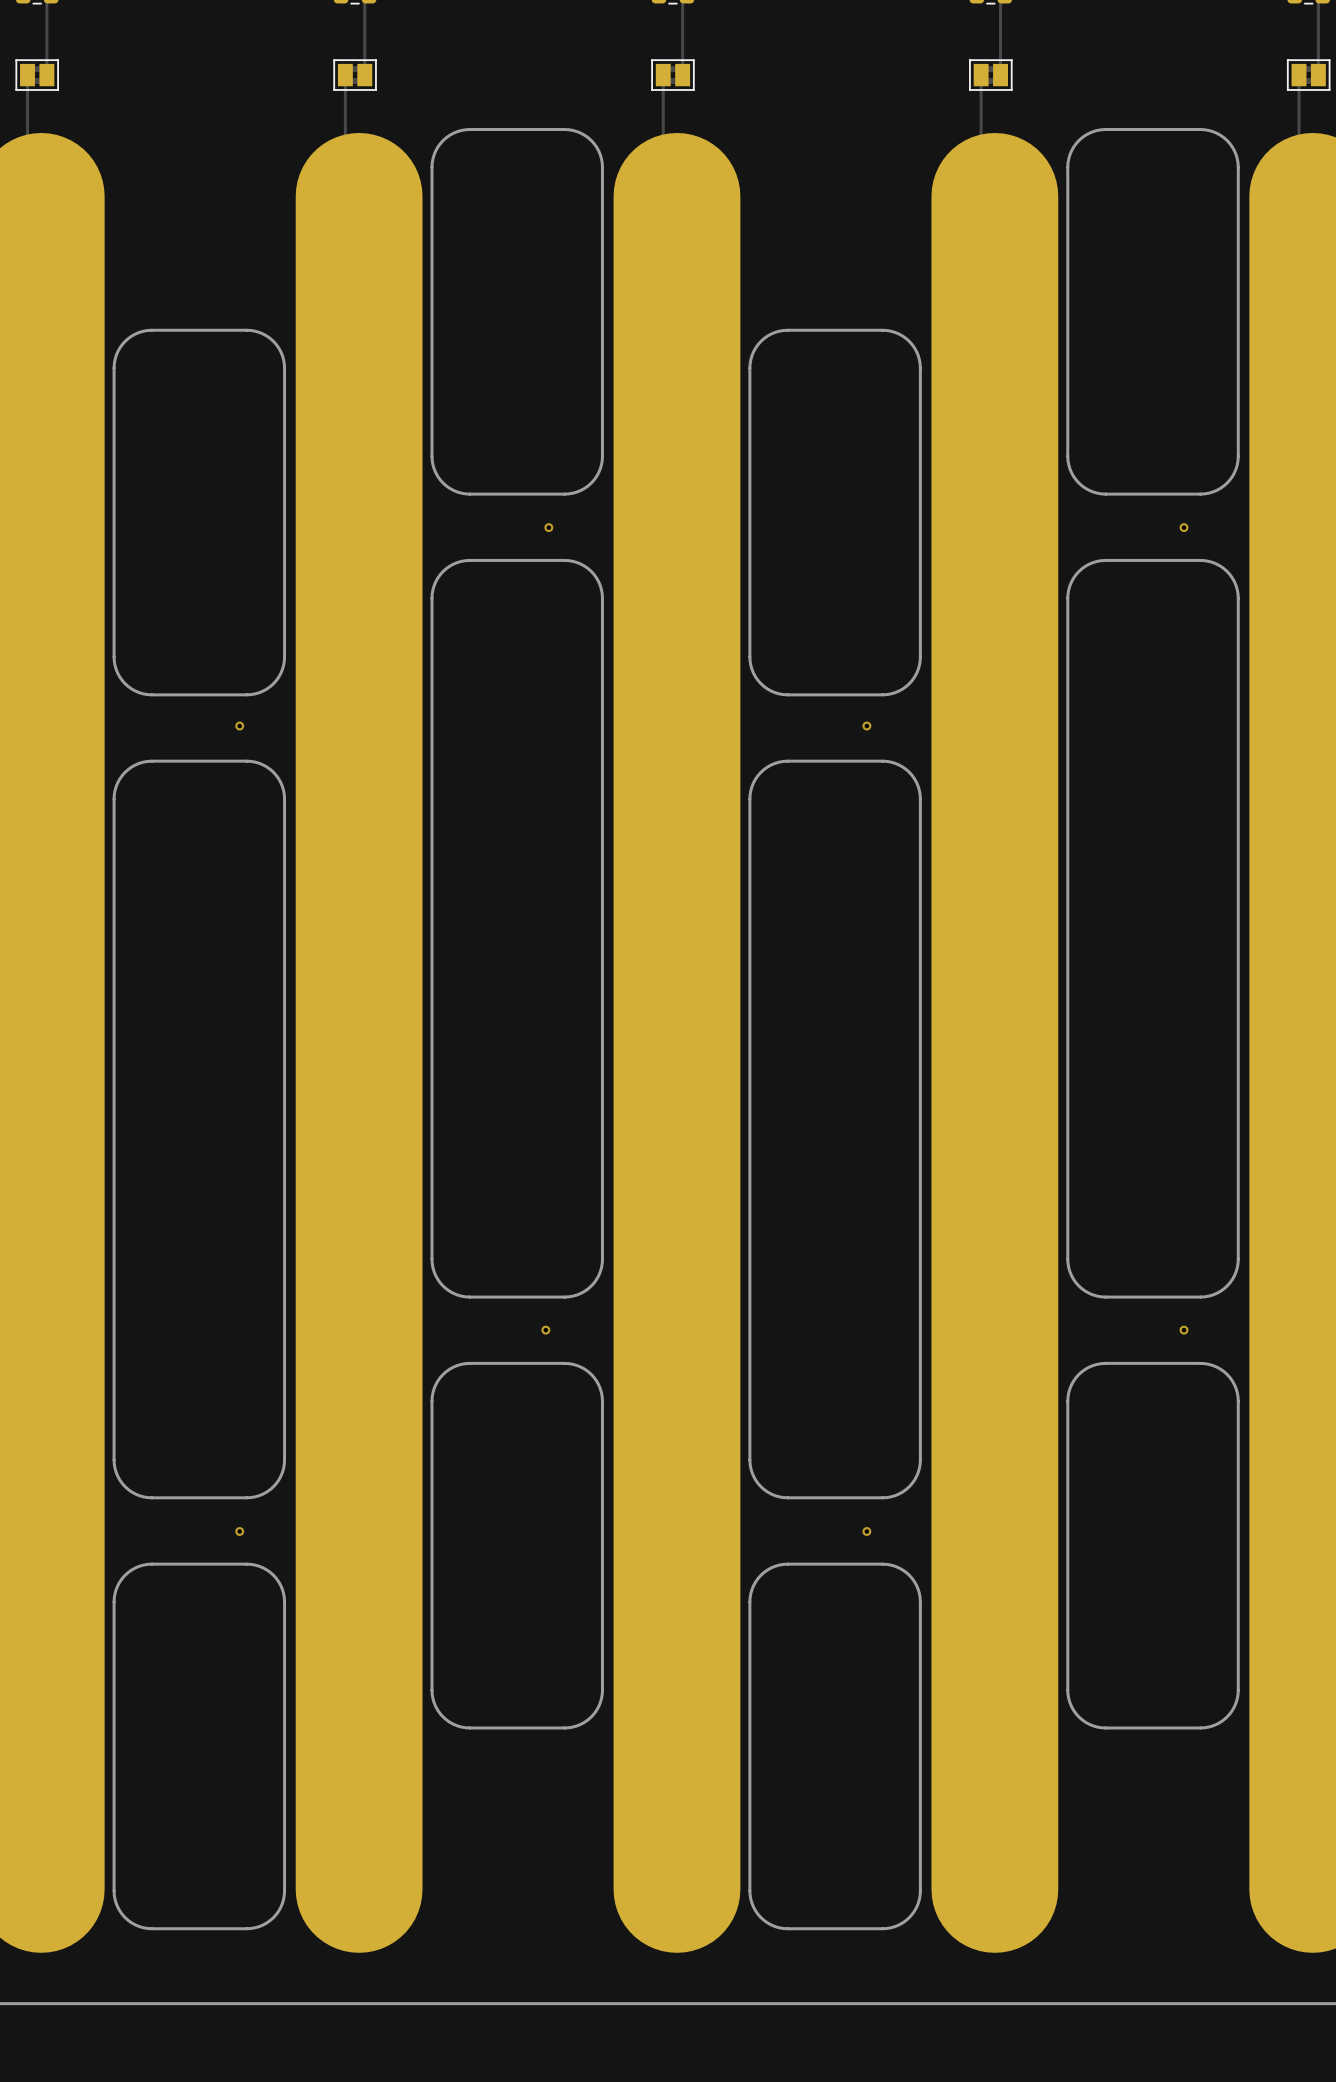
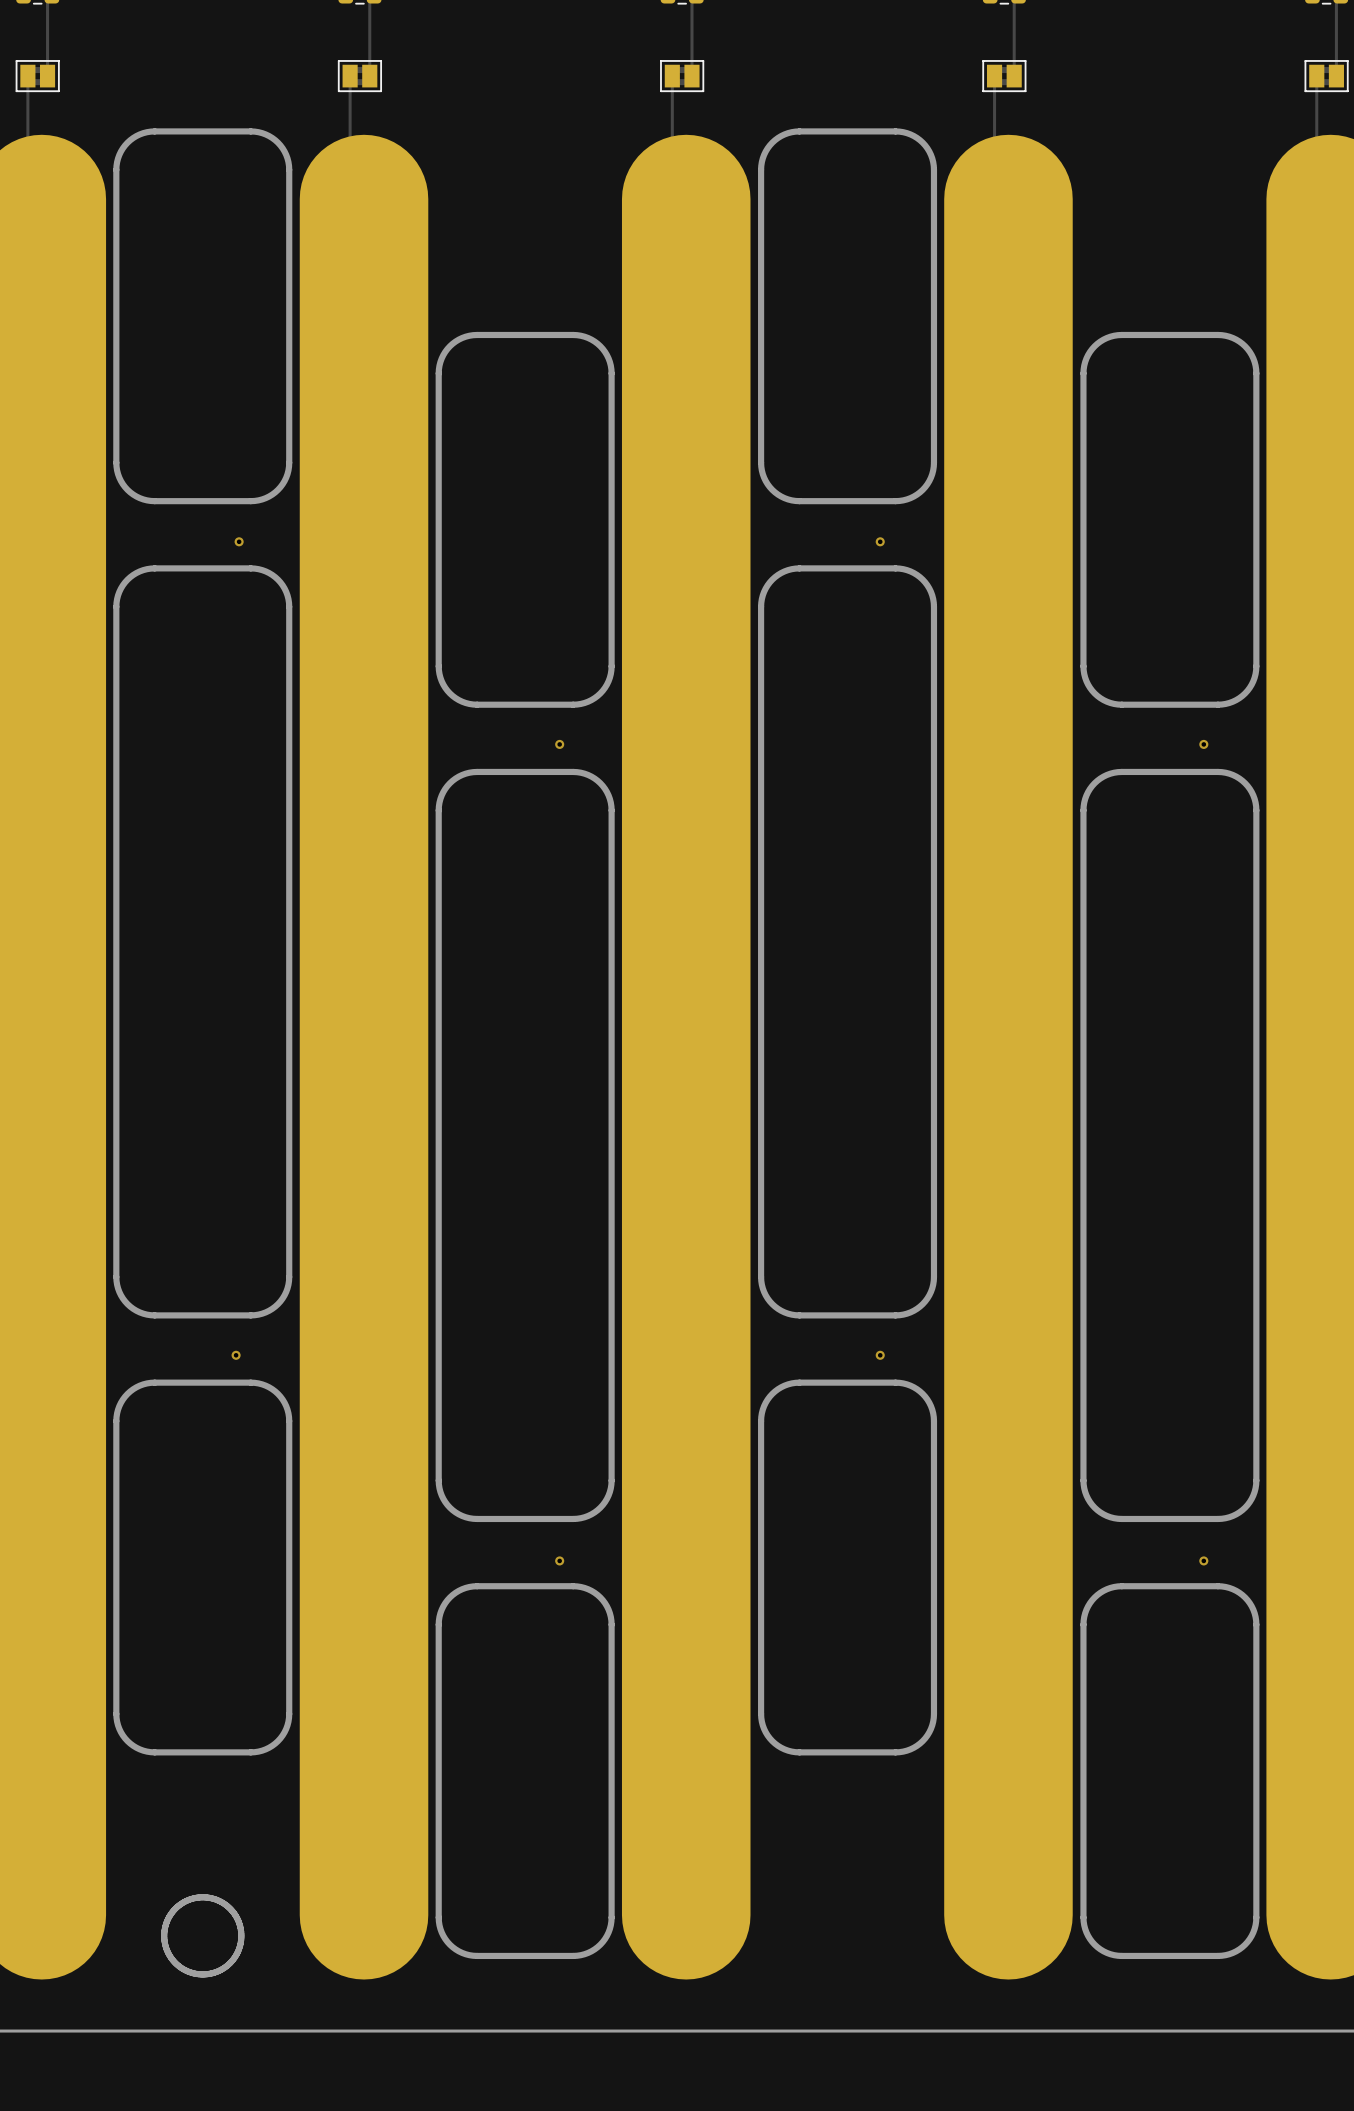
board edge: none -> (154, 131) (258, 132) (275, 140) (282, 148) (287, 158) (289, 169) (289, 466) (286, 477) (280, 487) (272, 494) (262, 499) (250, 501) (147, 500) (130, 492) (122, 484) (118, 474) (116, 462) (116, 165) (120, 151) (130, 140) (143, 133) (154, 131)
board edge: (469, 129) (573, 130) (588, 137) (600, 154) (602, 167) (602, 460) (594, 479) (577, 491) (564, 494) (465, 493) (446, 485) (434, 468) (431, 456) (432, 163) (437, 147) (446, 137) (457, 131) (469, 129) -> none
board edge: none -> (799, 131) (903, 132) (919, 140) (927, 148) (932, 158) (933, 169) (933, 466) (930, 477) (925, 487) (917, 494) (906, 499) (895, 501) (791, 500) (775, 492) (767, 484) (762, 474) (761, 462) (761, 165) (765, 151) (775, 140) (788, 133) (799, 131)
board edge: (1105, 129) (1208, 130) (1224, 137) (1236, 154) (1238, 167) (1238, 460) (1230, 479) (1212, 491) (1200, 494) (1101, 493) (1082, 485) (1069, 468) (1067, 456) (1068, 163) (1071, 150) (1078, 140) (1089, 133) (1105, 129) -> none
board edge: (151, 330) (255, 331) (270, 338) (282, 355) (284, 368) (284, 661) (276, 680) (259, 692) (246, 694) (147, 694) (128, 686) (116, 669) (114, 656) (114, 363) (119, 347) (128, 338) (139, 332) (151, 330) -> none
board edge: none -> (477, 334) (580, 335) (597, 343) (605, 351) (609, 361) (611, 373) (611, 670) (608, 681) (602, 690) (594, 698) (584, 702) (573, 704) (469, 703) (452, 695) (445, 687) (440, 677) (438, 666) (438, 369) (443, 355) (452, 343) (465, 336) (477, 334)
board edge: (787, 330) (890, 331) (909, 341) (918, 355) (920, 368) (920, 661) (912, 680) (895, 692) (882, 694) (783, 694) (764, 686) (752, 669) (749, 656) (750, 363) (753, 351) (760, 341) (771, 334) (787, 330) -> none
board edge: none -> (1121, 334) (1225, 335) (1242, 343) (1249, 351) (1254, 361) (1256, 373) (1256, 670) (1253, 681) (1247, 690) (1239, 698) (1229, 702) (1217, 704) (1114, 703) (1097, 695) (1090, 687) (1085, 677) (1083, 666) (1083, 369) (1088, 355) (1097, 343) (1110, 336) (1121, 334)
via: (548, 527) -> none
via: (1184, 527) -> none
via: none -> (239, 541)
via: none -> (880, 541)
board edge: (469, 560) (573, 561) (591, 571) (598, 581) (602, 594) (602, 1259) (600, 1271) (594, 1282) (581, 1293) (568, 1296) (461, 1296) (449, 1291) (440, 1282) (432, 1263) (431, 598) (434, 585) (443, 571) (453, 564) (469, 560) -> (477, 771) (465, 773) (452, 780) (443, 792) (438, 806) (438, 1484) (441, 1495) (447, 1504) (458, 1514) (469, 1518) (577, 1518) (591, 1514) (602, 1504) (609, 1491) (611, 1480) (611, 806) (608, 795) (602, 785) (591, 776) (580, 772) (477, 771)
board edge: (1105, 560) (1208, 561) (1227, 571) (1234, 581) (1238, 594) (1238, 1259) (1234, 1275) (1227, 1285) (1216, 1293) (1204, 1296) (1097, 1296) (1078, 1285) (1071, 1275) (1068, 1263) (1067, 598) (1071, 581) (1078, 571) (1093, 562) (1105, 560) -> (1121, 771) (1110, 773) (1097, 780) (1088, 792) (1083, 806) (1083, 1484) (1086, 1495) (1092, 1504) (1103, 1514) (1114, 1518) (1221, 1518) (1236, 1514) (1247, 1504) (1254, 1491) (1256, 1480) (1256, 806) (1253, 795) (1247, 785) (1236, 776) (1225, 772) (1121, 771)
via: (239, 726) -> none
via: (866, 726) -> none
via: none -> (559, 744)
via: none -> (1203, 744)
board edge: (151, 761) (255, 762) (273, 772) (280, 782) (284, 794) (284, 1459) (282, 1472) (273, 1486) (263, 1494) (250, 1497) (143, 1496) (131, 1492) (122, 1483) (114, 1464) (114, 799) (116, 786) (125, 772) (139, 763) (151, 761) -> (154, 568) (143, 570) (130, 577) (120, 588) (116, 602) (116, 1280) (119, 1291) (125, 1301) (136, 1310) (147, 1314) (254, 1315) (269, 1310) (280, 1301) (287, 1288) (289, 1276) (289, 602) (286, 591) (280, 582) (269, 573) (258, 569) (154, 568)
board edge: (787, 761) (890, 762) (902, 766) (912, 775) (920, 794) (920, 1459) (918, 1472) (912, 1483) (902, 1492) (886, 1497) (779, 1496) (767, 1492) (758, 1483) (750, 1464) (749, 799) (752, 786) (760, 772) (771, 764) (787, 761) -> (799, 568) (788, 570) (775, 577) (765, 588) (761, 602) (761, 1280) (764, 1291) (769, 1301) (781, 1310) (791, 1314) (899, 1315) (913, 1310) (925, 1301) (932, 1288) (933, 1276) (933, 602) (930, 591) (925, 582) (913, 573) (903, 569) (799, 568)
via: (545, 1330) -> none
via: (1184, 1330) -> none
via: none -> (236, 1355)
via: none -> (880, 1355)
board edge: (469, 1363) (573, 1364) (591, 1374) (600, 1388) (602, 1401) (602, 1694) (594, 1713) (577, 1725) (564, 1727) (465, 1727) (446, 1719) (434, 1702) (431, 1690) (432, 1397) (435, 1384) (443, 1374) (453, 1367) (469, 1363) -> none
board edge: (1105, 1363) (1208, 1364) (1227, 1374) (1236, 1388) (1238, 1401) (1238, 1694) (1230, 1713) (1212, 1725) (1200, 1727) (1101, 1727) (1082, 1719) (1069, 1702) (1067, 1690) (1068, 1397) (1071, 1384) (1082, 1371) (1093, 1365) (1105, 1363) -> none
board edge: none -> (154, 1382) (258, 1383) (275, 1391) (282, 1399) (287, 1409) (289, 1421) (289, 1717) (286, 1728) (280, 1738) (272, 1745) (262, 1750) (250, 1752) (147, 1751) (130, 1743) (122, 1735) (118, 1725) (116, 1713) (116, 1417) (120, 1402) (130, 1391) (143, 1384) (154, 1382)
board edge: none -> (799, 1382) (903, 1383) (919, 1391) (927, 1399) (932, 1409) (933, 1421) (933, 1717) (930, 1728) (925, 1738) (917, 1745) (906, 1750) (895, 1752) (791, 1751) (775, 1743) (767, 1735) (762, 1725) (761, 1713) (761, 1417) (765, 1402) (775, 1391) (788, 1384) (799, 1382)
via: (239, 1531) -> none
via: (866, 1531) -> none
via: none -> (559, 1560)
via: none -> (1203, 1560)
board edge: (151, 1564) (255, 1565) (270, 1572) (282, 1589) (284, 1602) (284, 1895) (276, 1914) (259, 1926) (246, 1928) (147, 1928) (128, 1920) (116, 1903) (114, 1890) (114, 1597) (117, 1585) (128, 1572) (139, 1566) (151, 1564) -> none
board edge: none -> (477, 1586) (580, 1586) (597, 1594) (605, 1603) (609, 1613) (611, 1624) (611, 1921) (608, 1932) (602, 1941) (594, 1949) (584, 1954) (573, 1955) (469, 1955) (452, 1947) (445, 1939) (440, 1928) (438, 1917) (438, 1620) (443, 1606) (452, 1594) (465, 1587) (477, 1586)
board edge: (787, 1564) (890, 1565) (909, 1575) (918, 1589) (920, 1602) (920, 1895) (912, 1914) (895, 1926) (882, 1928) (783, 1928) (764, 1920) (752, 1903) (749, 1890) (750, 1597) (753, 1585) (764, 1572) (775, 1566) (787, 1564) -> none
board edge: none -> (1121, 1586) (1225, 1586) (1242, 1594) (1249, 1603) (1254, 1613) (1256, 1624) (1256, 1921) (1253, 1932) (1247, 1941) (1239, 1949) (1229, 1954) (1217, 1955) (1114, 1955) (1097, 1947) (1090, 1939) (1085, 1928) (1083, 1917) (1083, 1620) (1088, 1606) (1097, 1594) (1110, 1587) (1121, 1586)
board edge: none -> (202, 1897) (187, 1900) (175, 1908) (167, 1920) (164, 1935) (167, 1950) (175, 1963) (187, 1971) (202, 1974) (217, 1971) (230, 1963) (238, 1950) (241, 1935) (238, 1920) (230, 1908) (217, 1900) (202, 1897)

